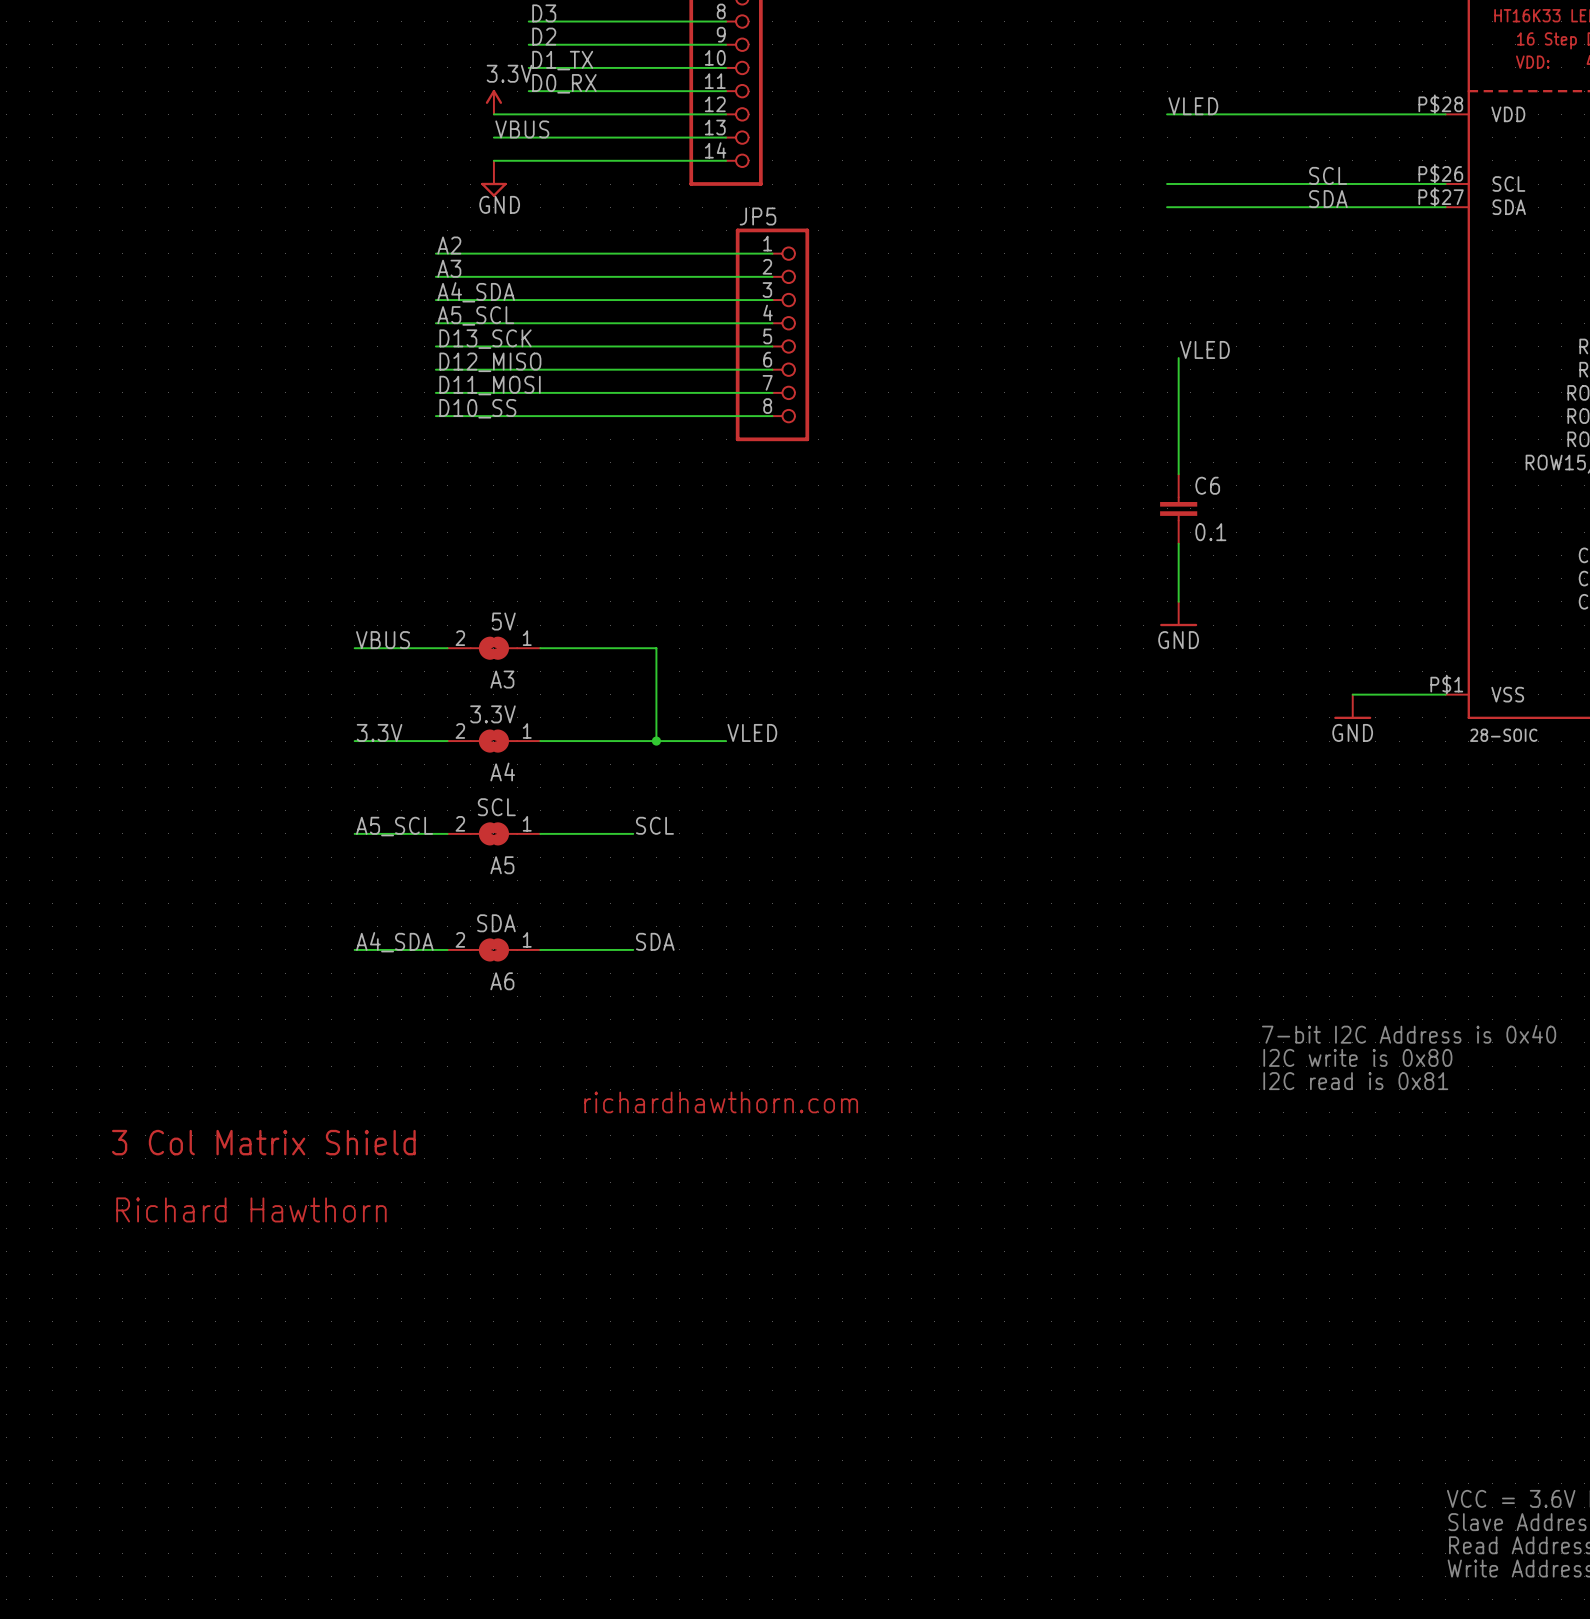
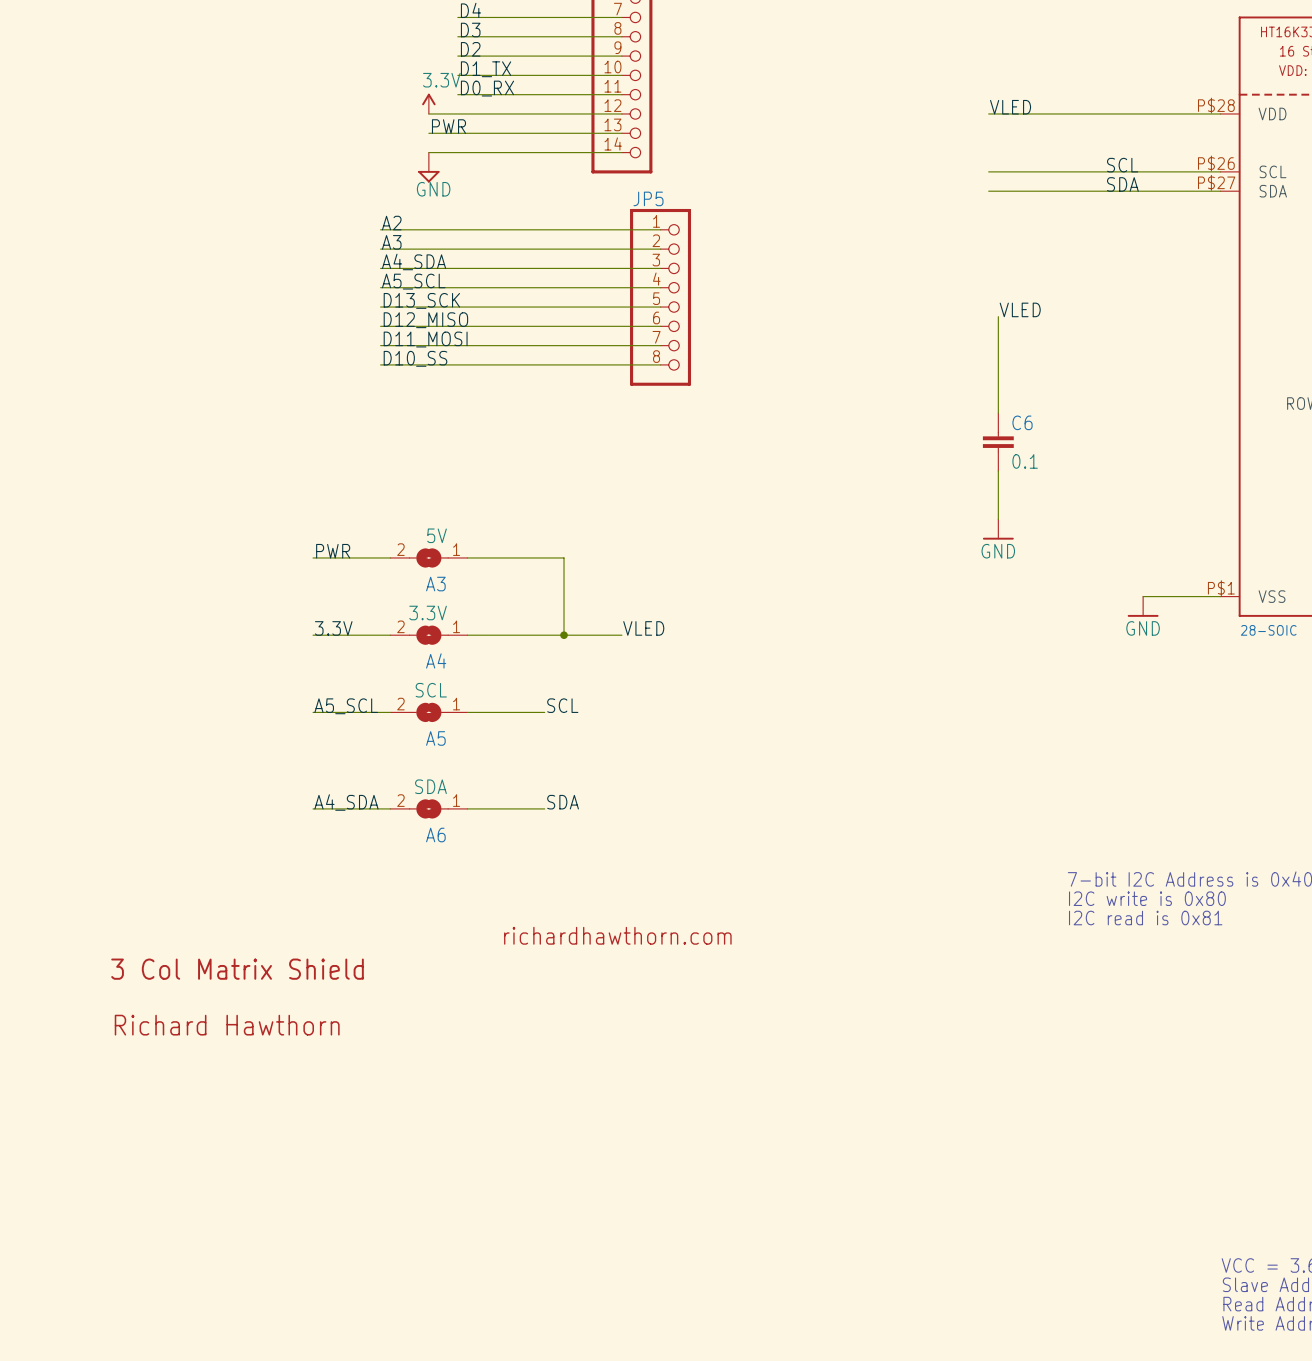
label: VBUS (522, 129) -> PWR (448, 126)
label: VBUS (383, 640) -> PWR (333, 551)

